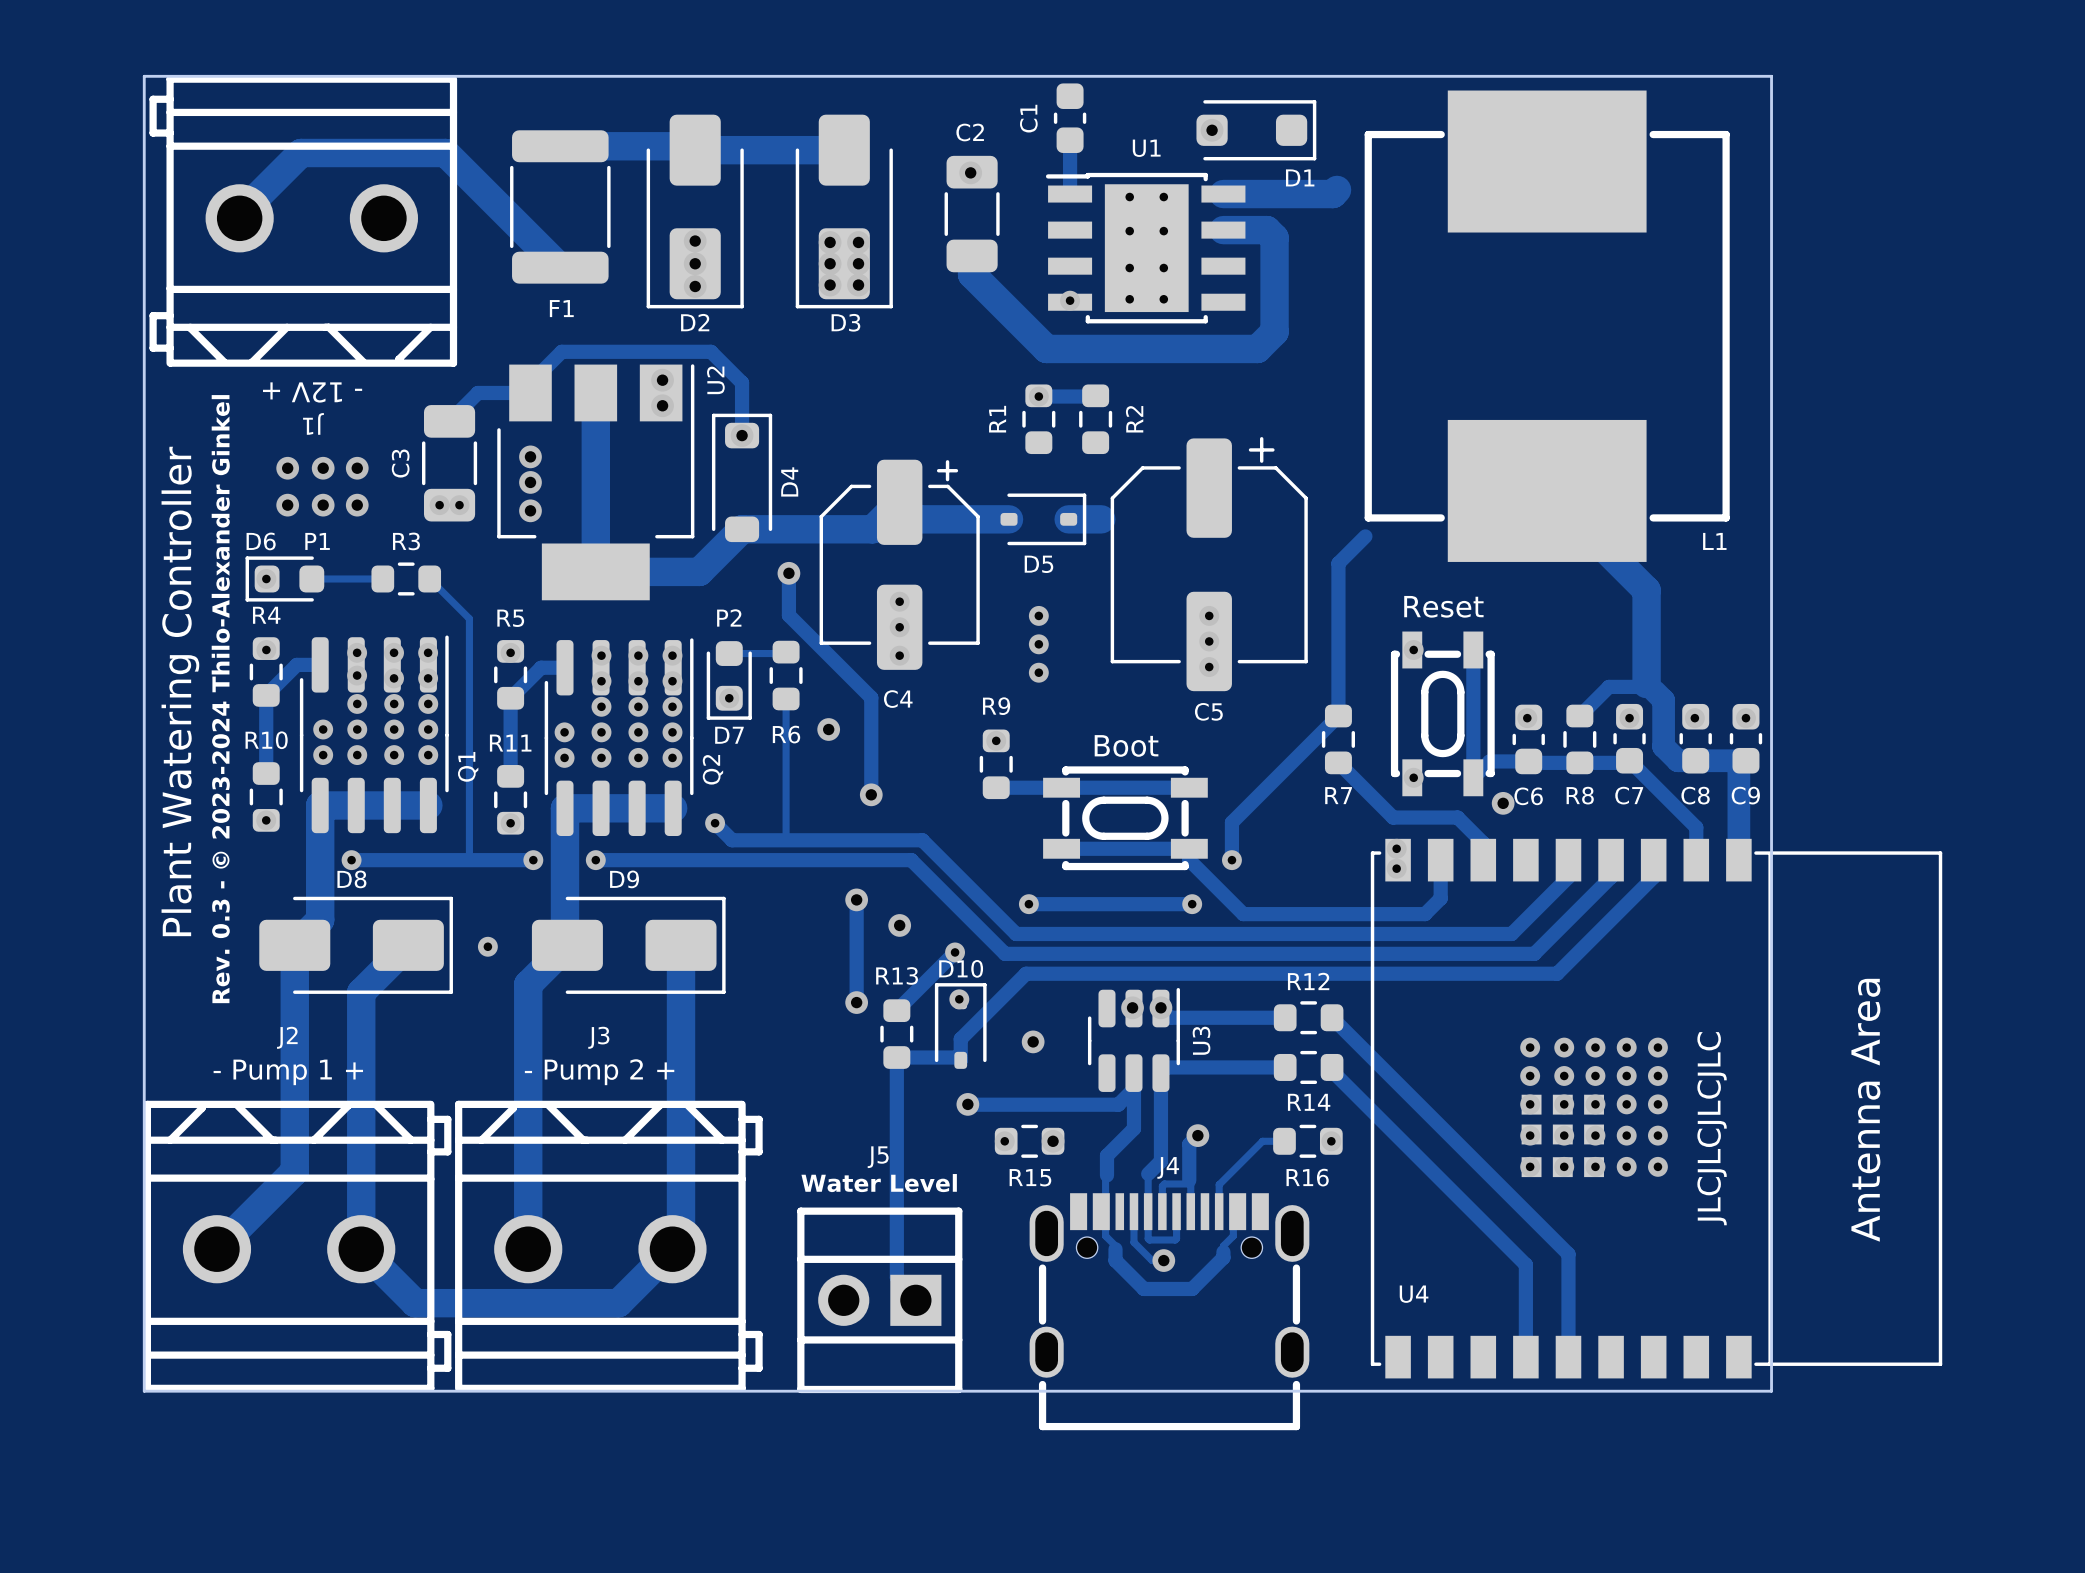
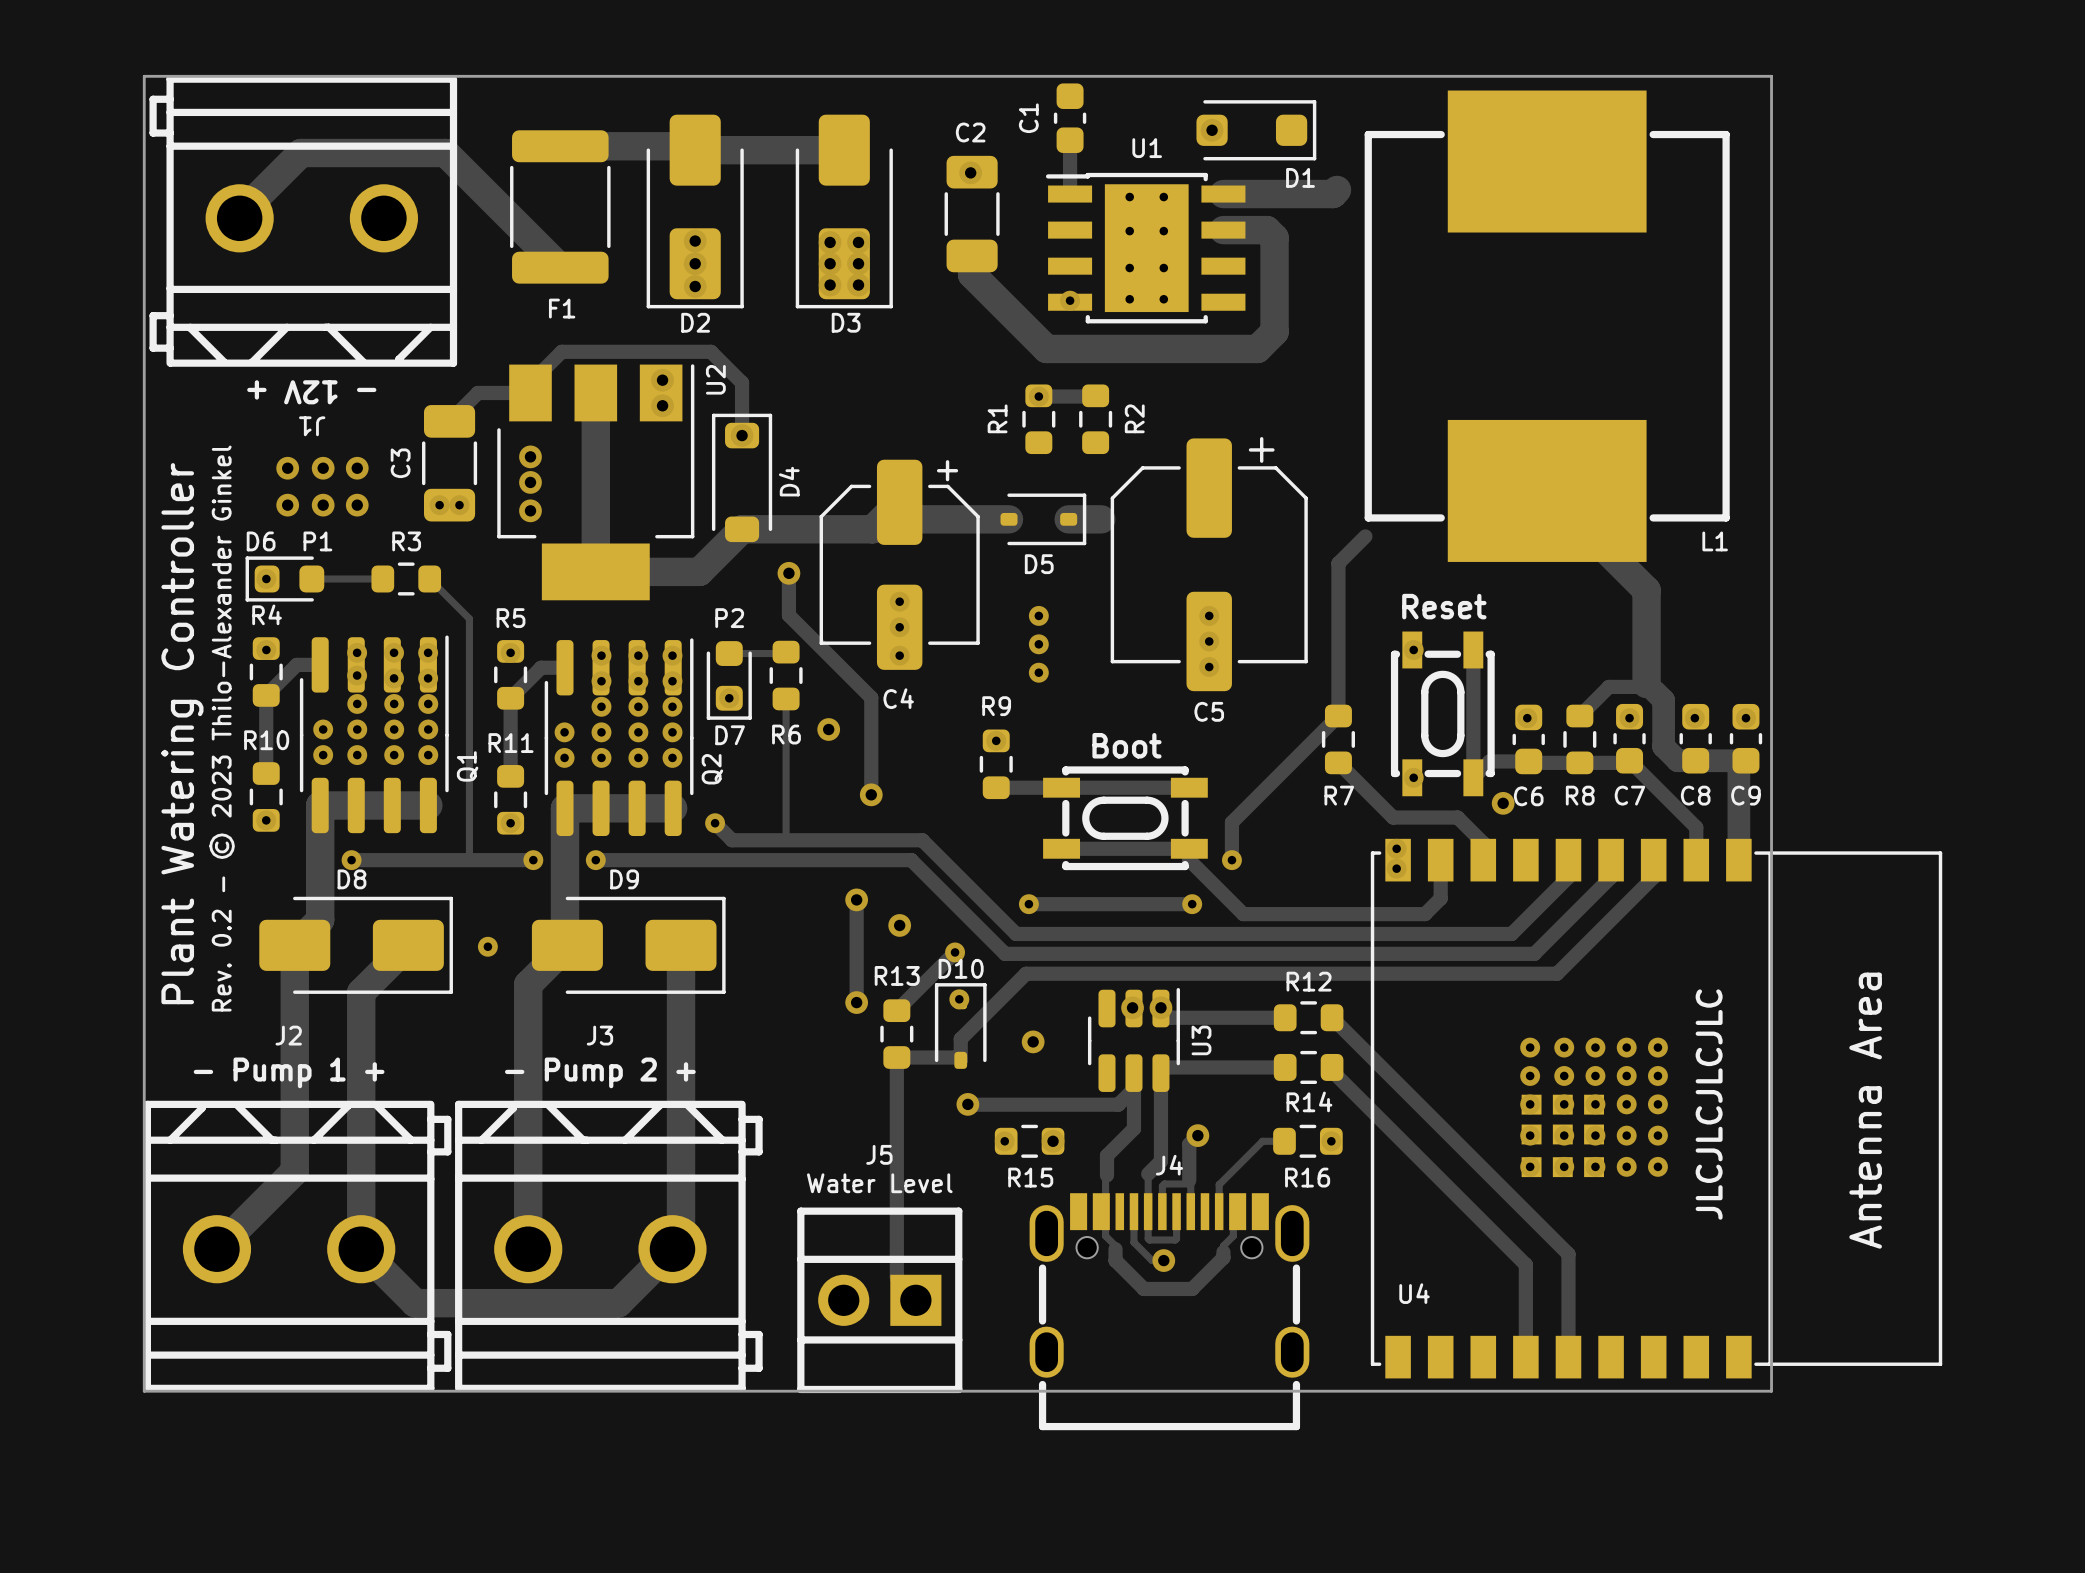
text position: Plant Watering Controller (180, 691) -> Plant Watering Controller (182, 733)
text: Rev. 0.3 - © 2023-2024 Thilo-Alexander Ginkel (220, 699) -> Rev. 0.2 - © 2023 Thilo-Alexander Ginkel (222, 728)

